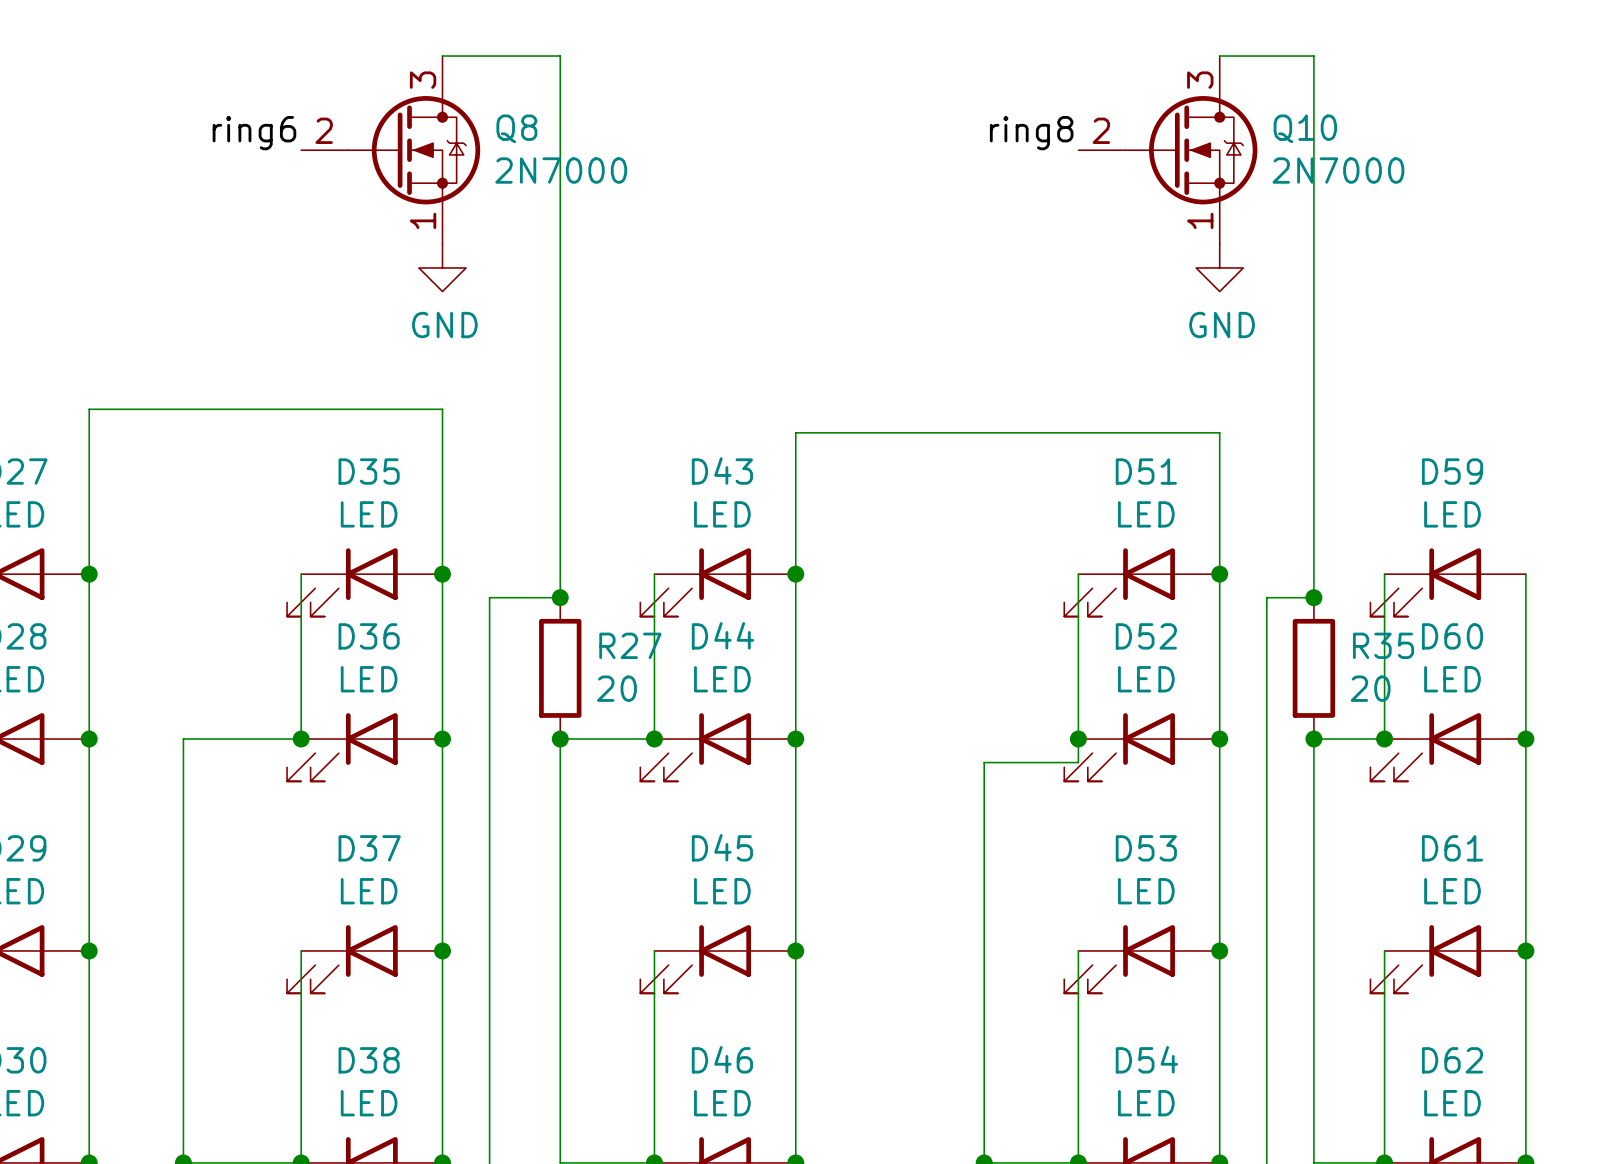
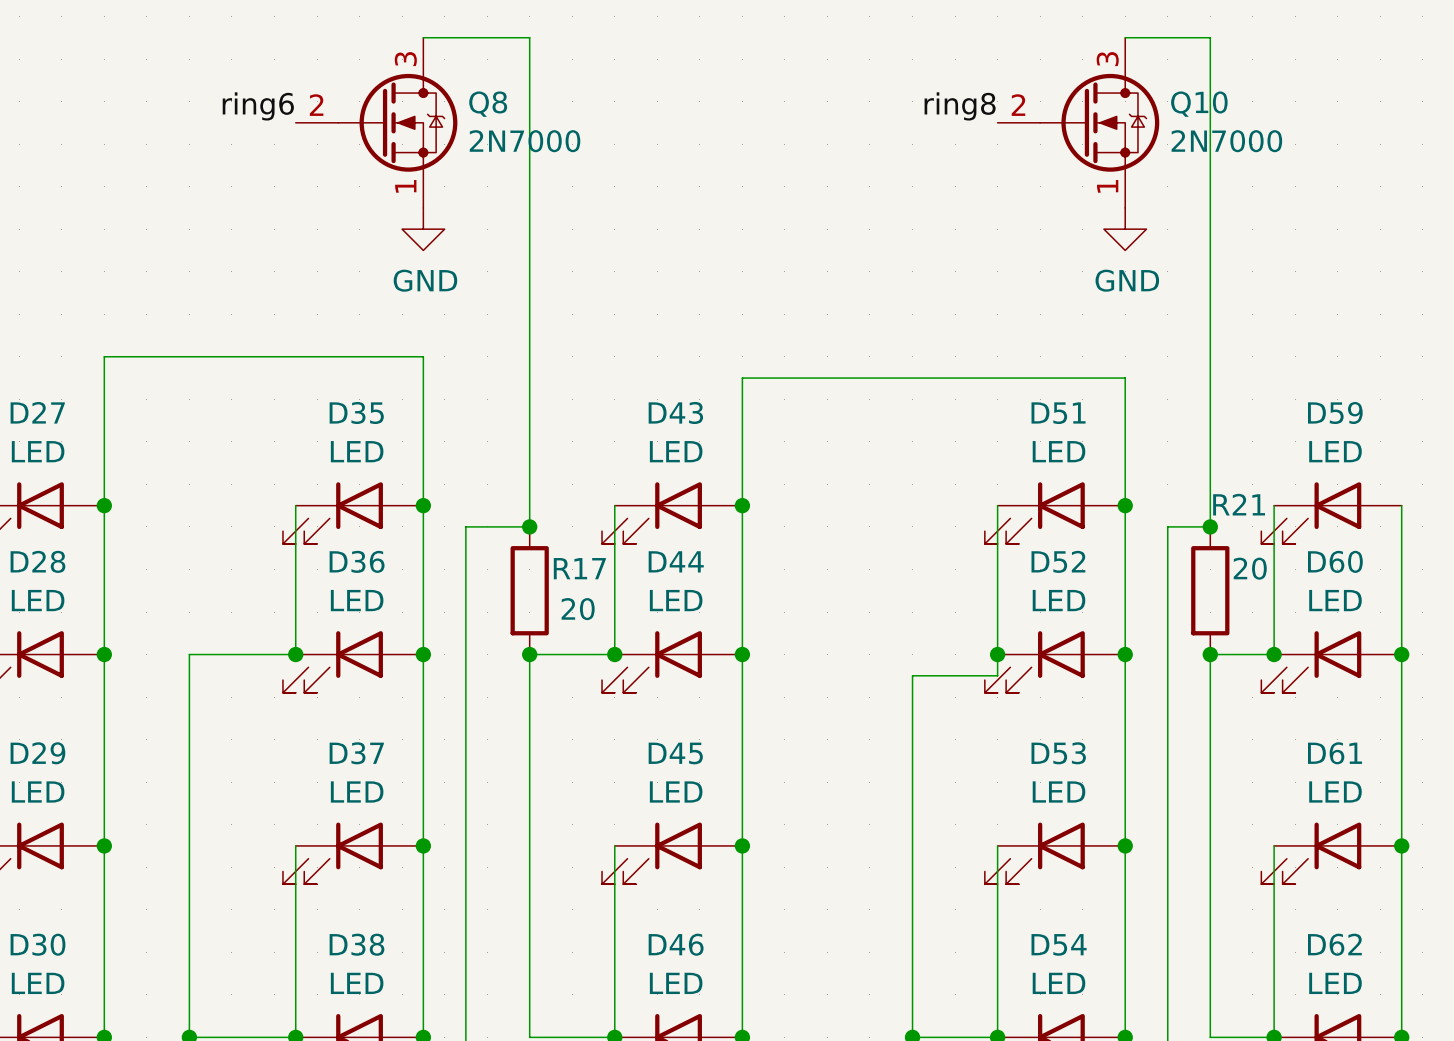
R27 name: R27 (630, 645) -> R17 (579, 568)
R35 name: R35 (1383, 645) -> R21 (1239, 504)
R35 value position: 20 (1370, 688) -> 20 (1250, 568)

